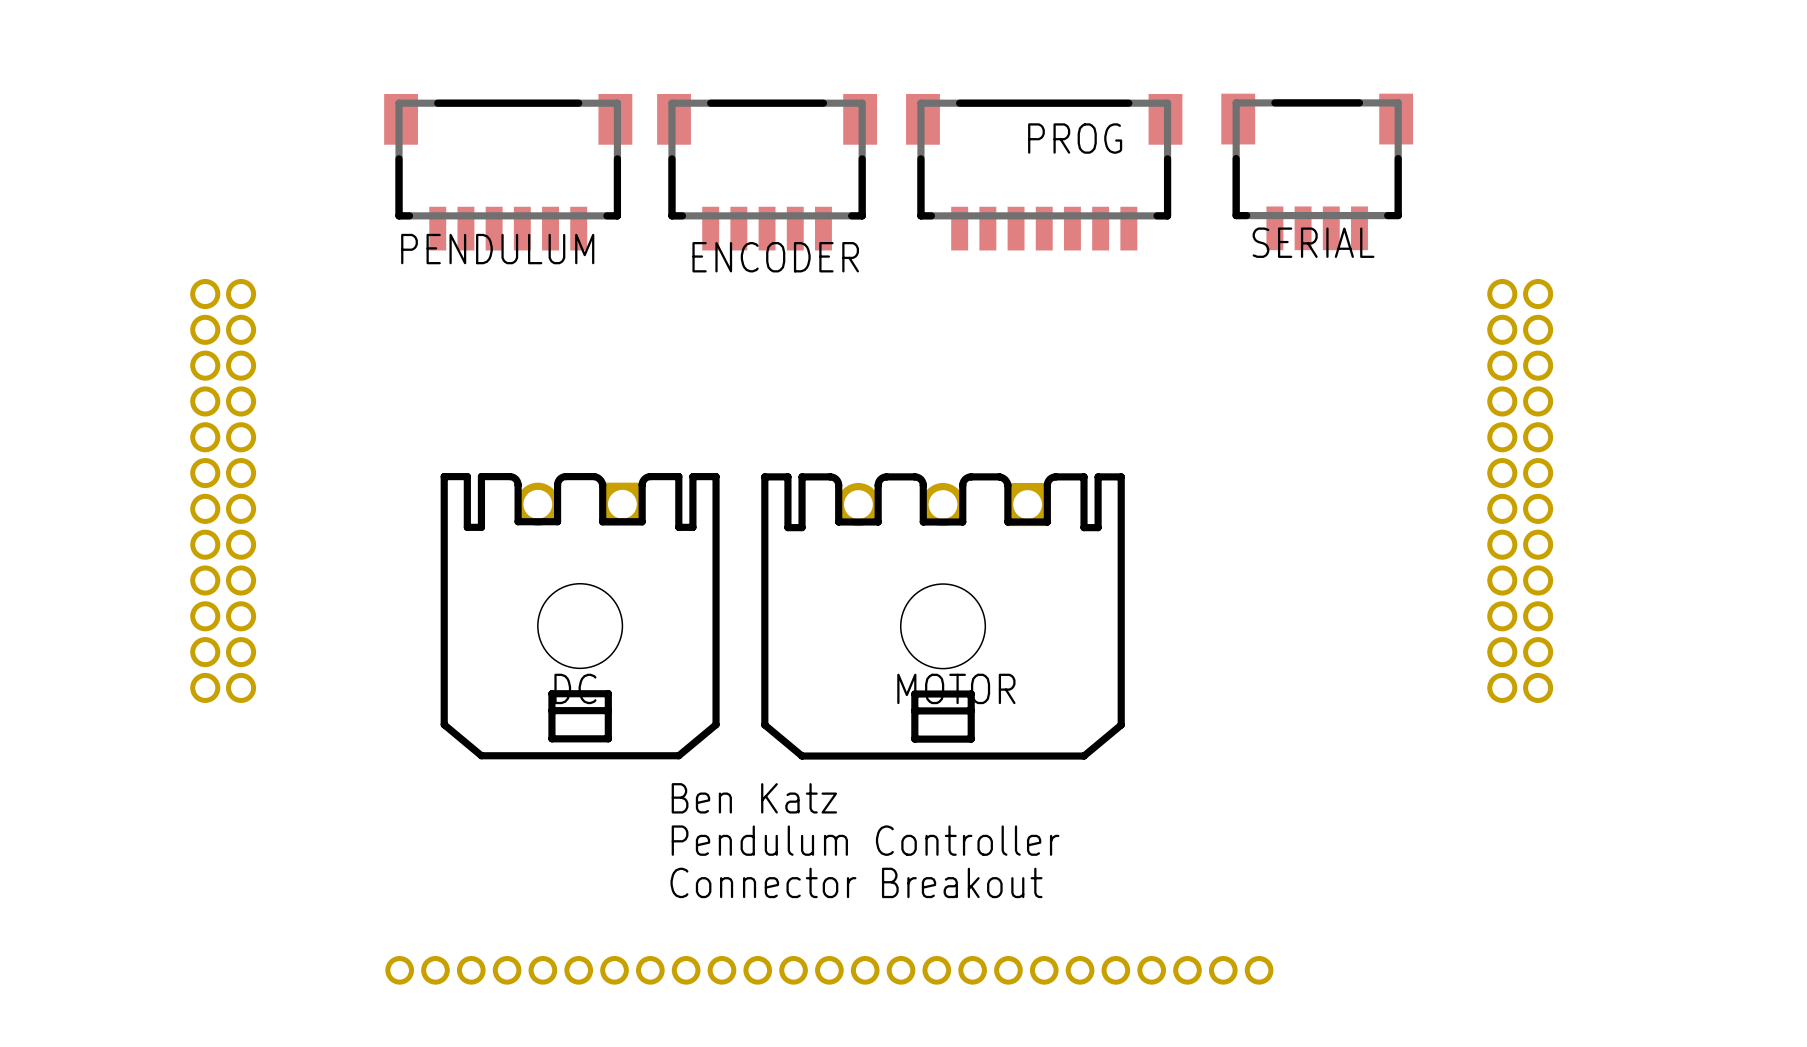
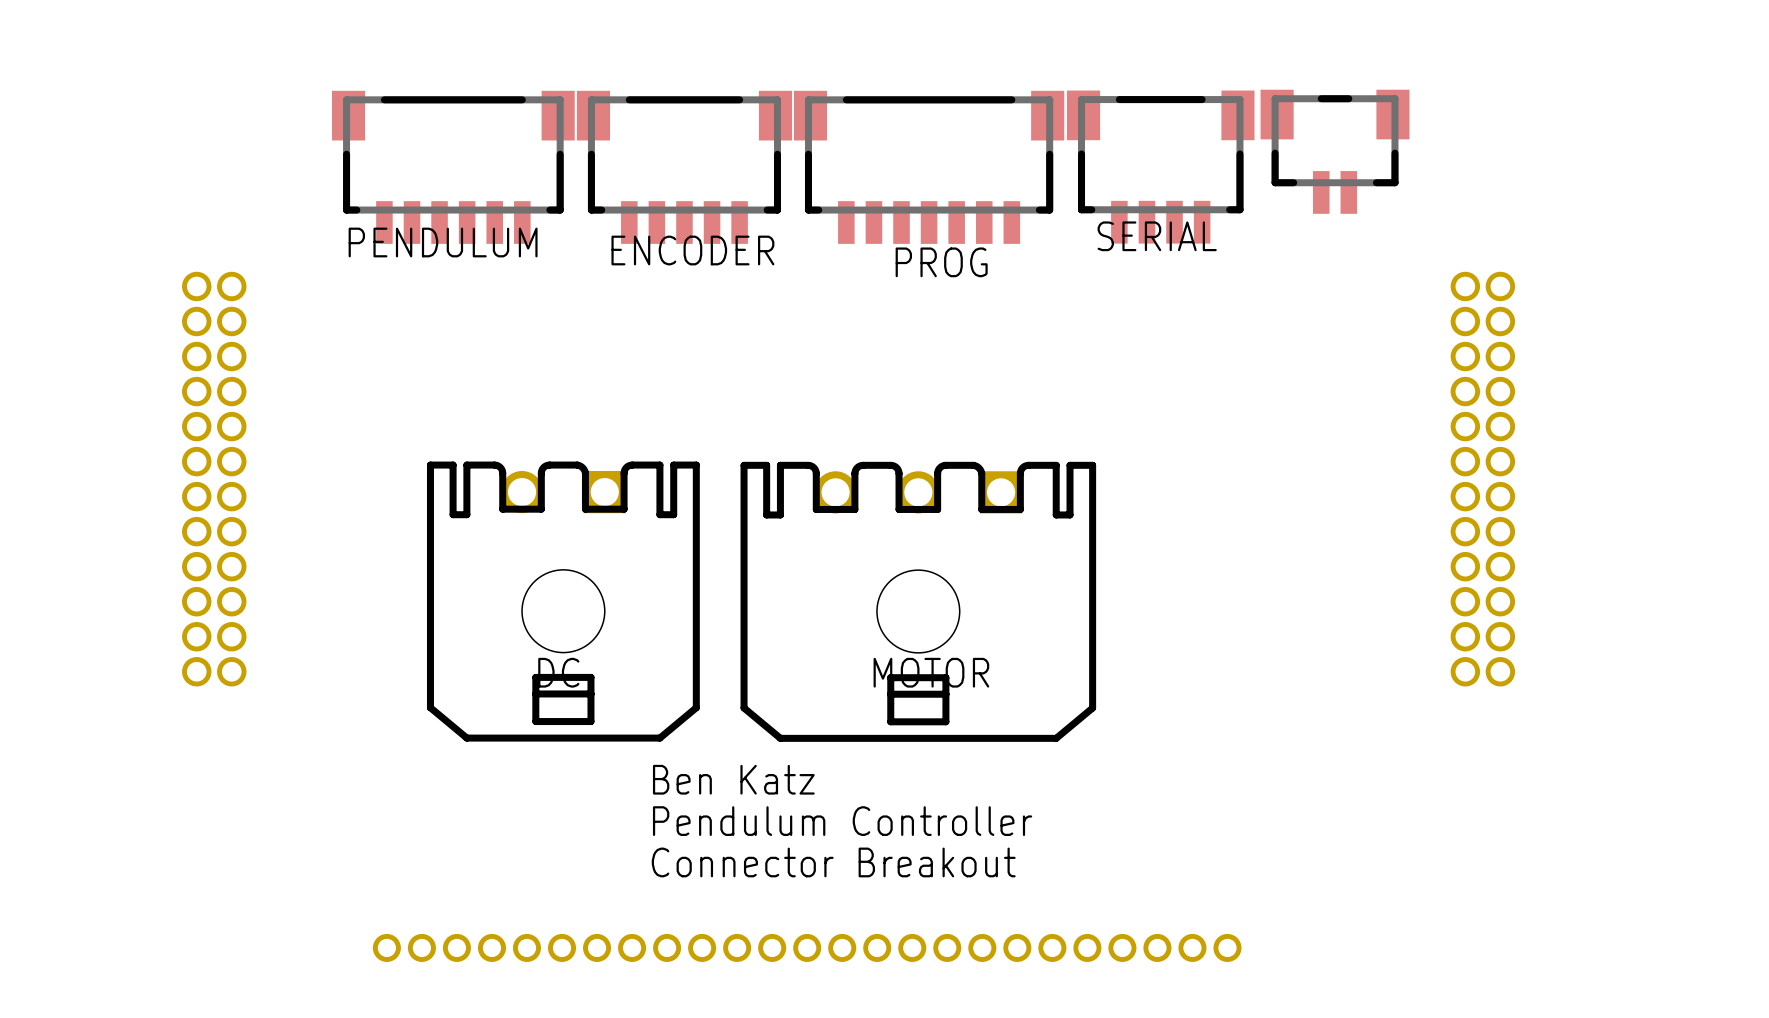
text position: PROG (1075, 138) -> PROG (941, 262)
part: none -> (1335, 151)
SERIAL position: (1317, 171) -> (1160, 167)
PENDULUM position: (508, 172) -> (453, 167)
ENCODER position: (767, 172) -> (684, 167)
part position: (1044, 172) -> (929, 167)

